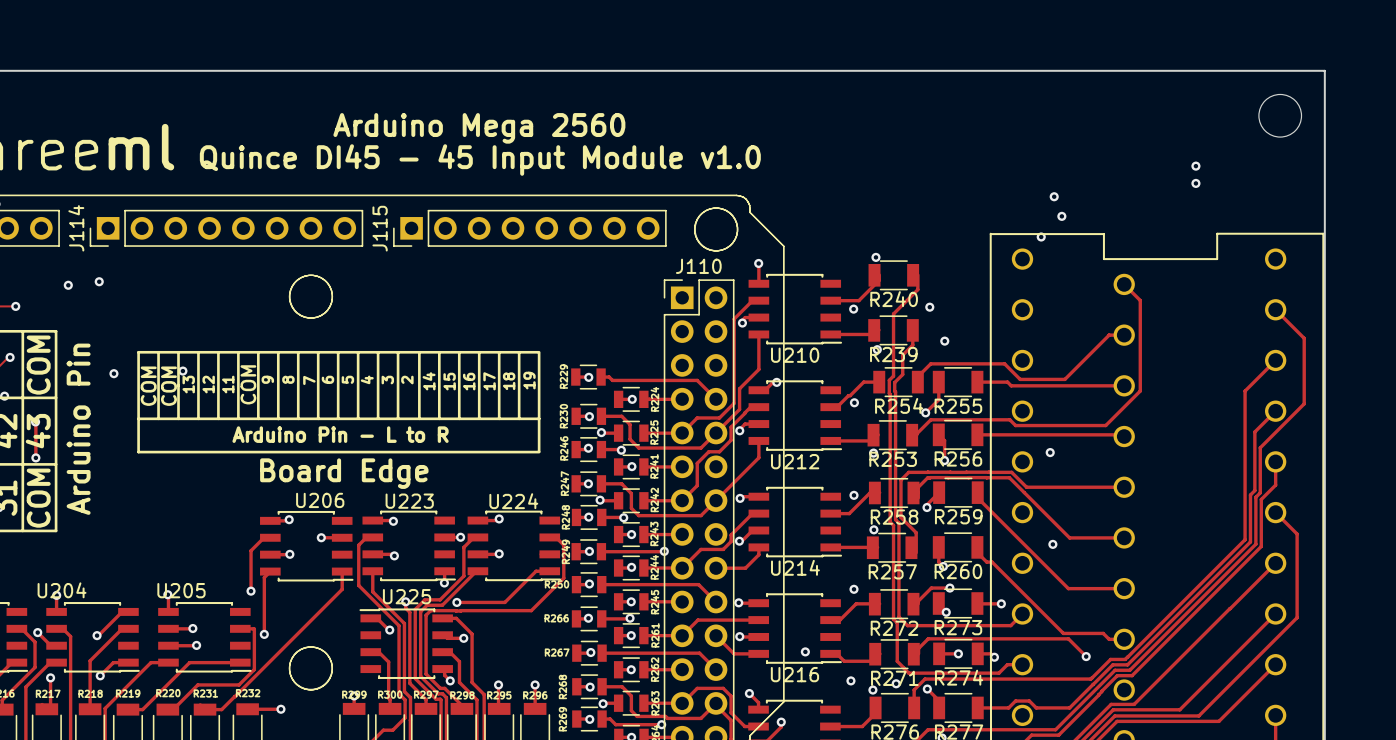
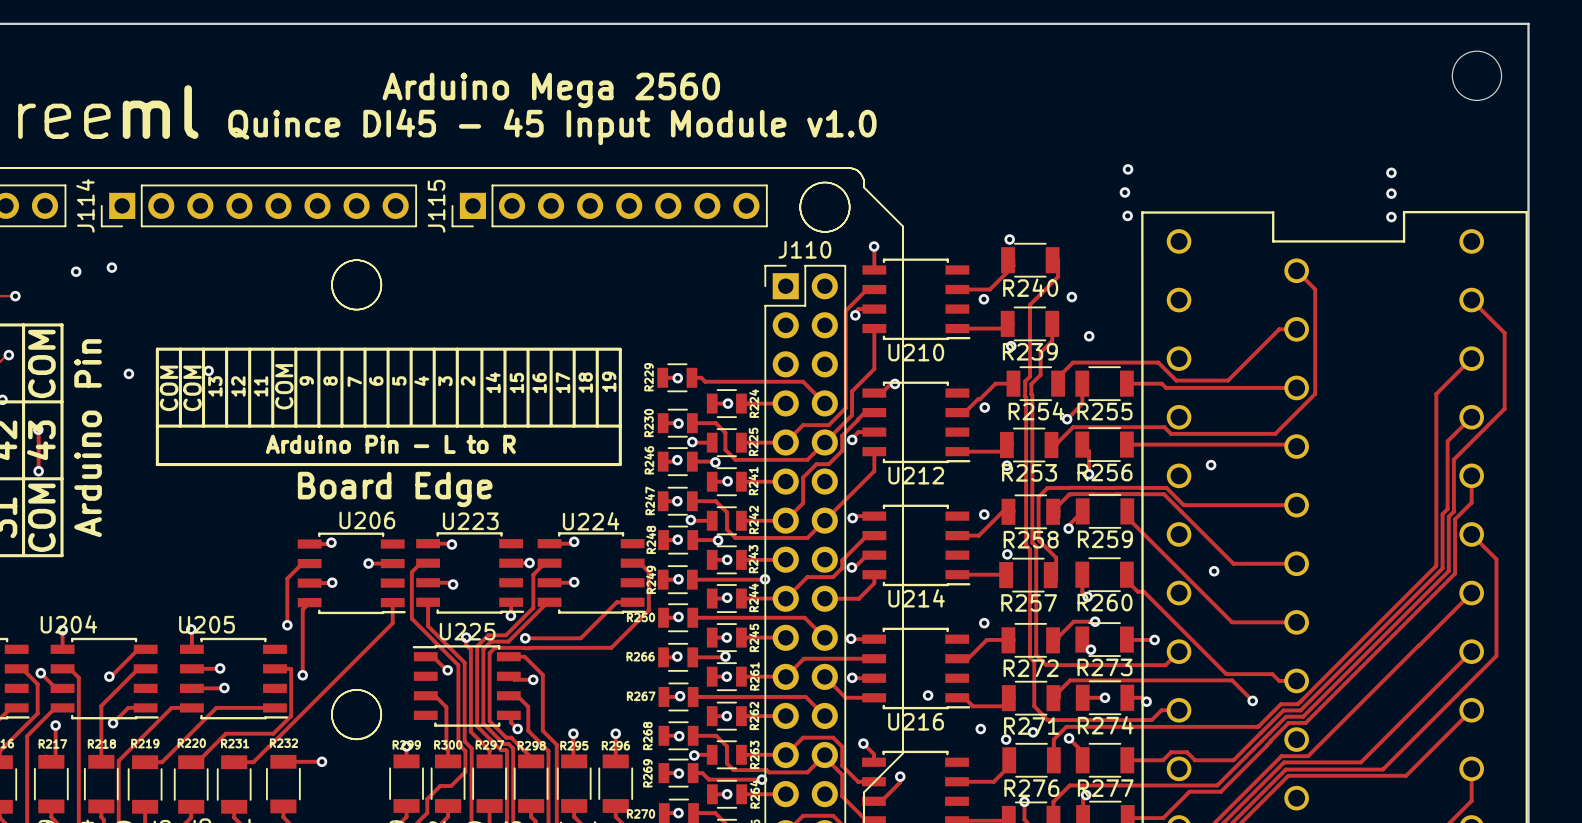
via: (1195, 166) -> none
via: (1195, 183) -> none
via: none -> (1128, 169)
via: (1054, 196) -> none
via: none -> (1391, 172)
via: none -> (1124, 192)
via: (1061, 216) -> none
via: none -> (1391, 193)
via: none -> (1127, 215)
via: (1041, 236) -> none
via: none -> (1391, 217)

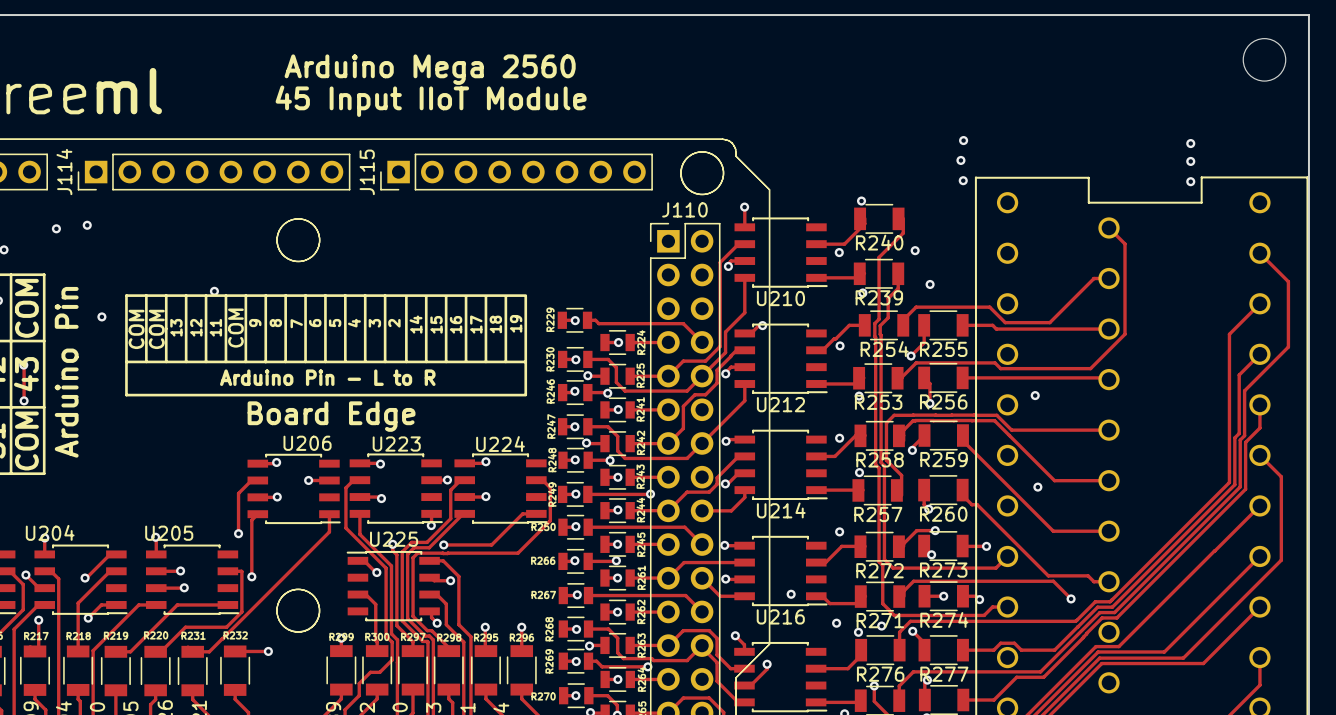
text position: Arduino Mega 2560 (551, 90) -> Arduino Mega 2560 (430, 69)
text: none -> 45 Input IIoT Module (431, 101)
text: Quince DI45 - 45 Input Module v1.0 (552, 126) -> none
via position: (208, 370) -> (214, 291)

